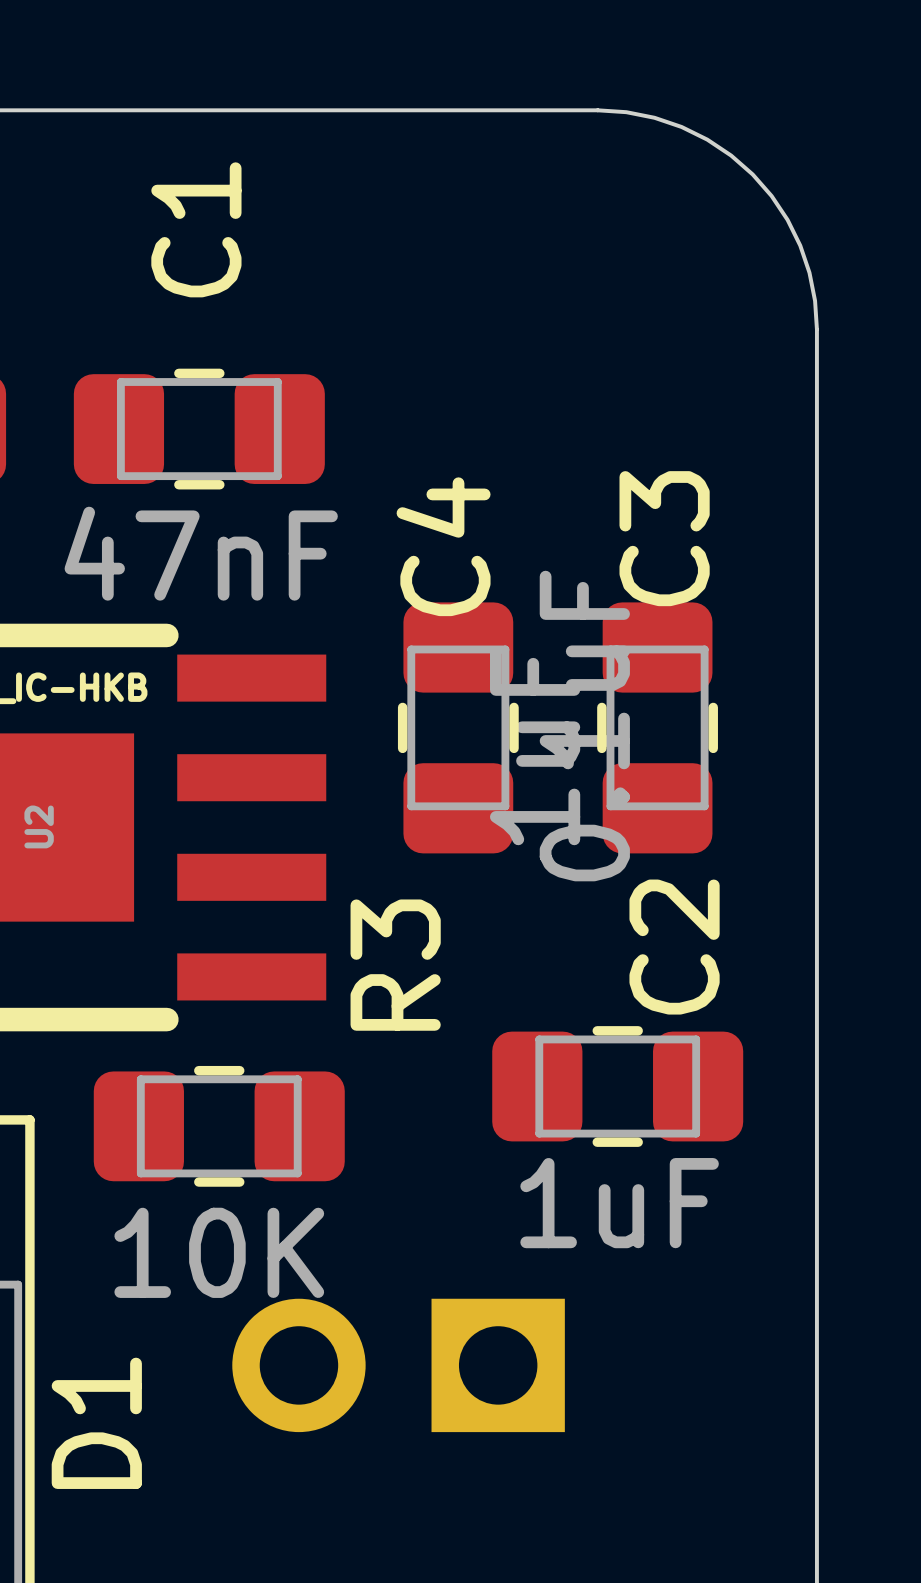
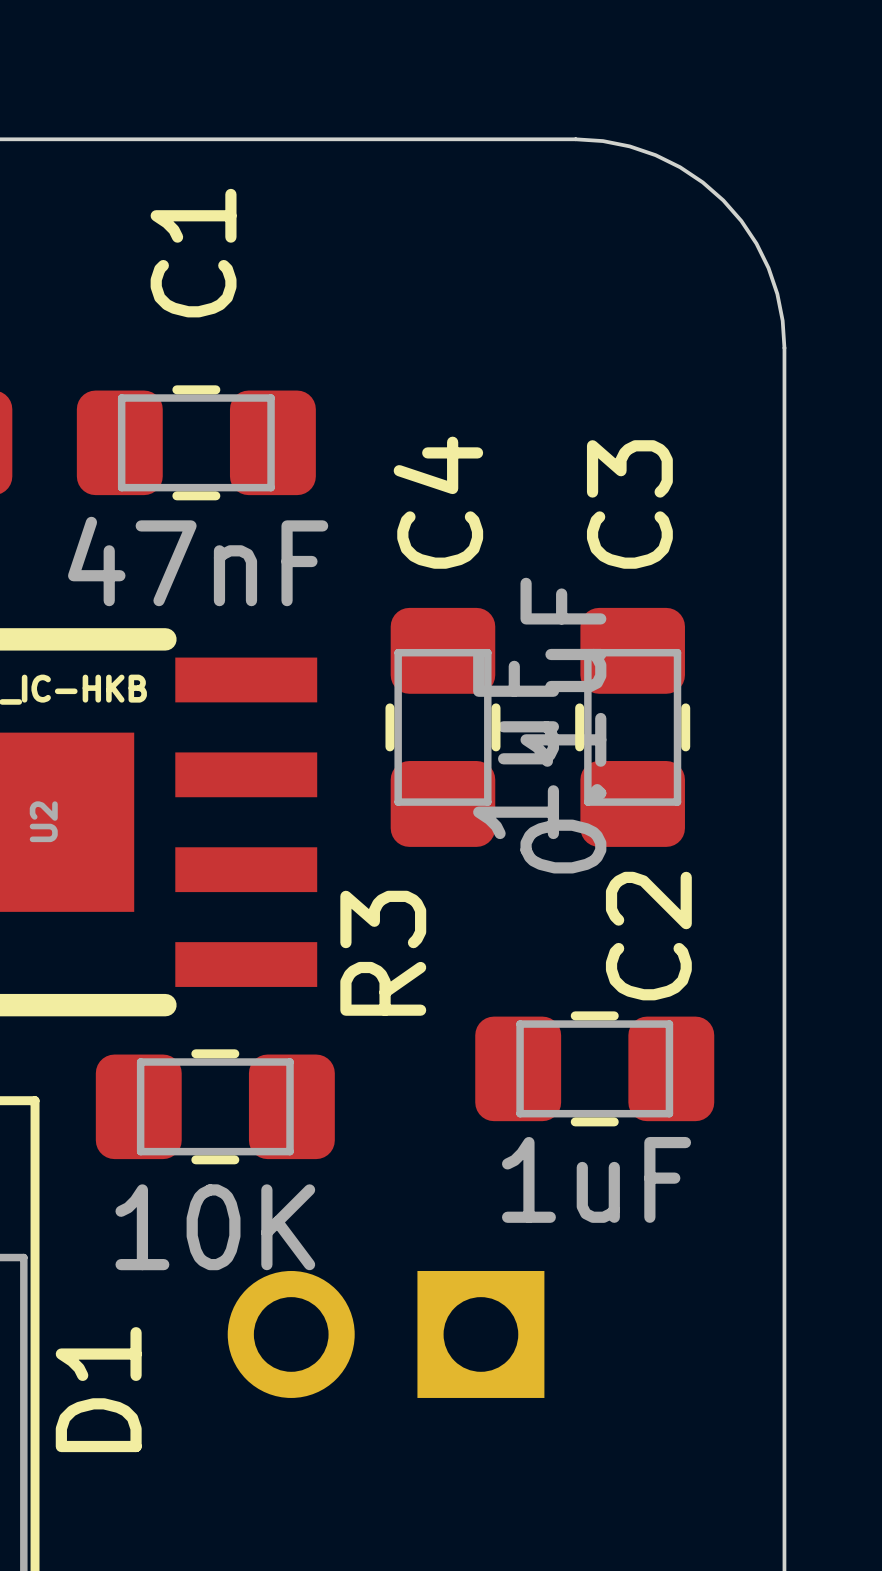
C3 name position: C3 (664, 538) -> C3 (629, 504)
C4 name position: C4 (443, 546) -> C4 (438, 502)

